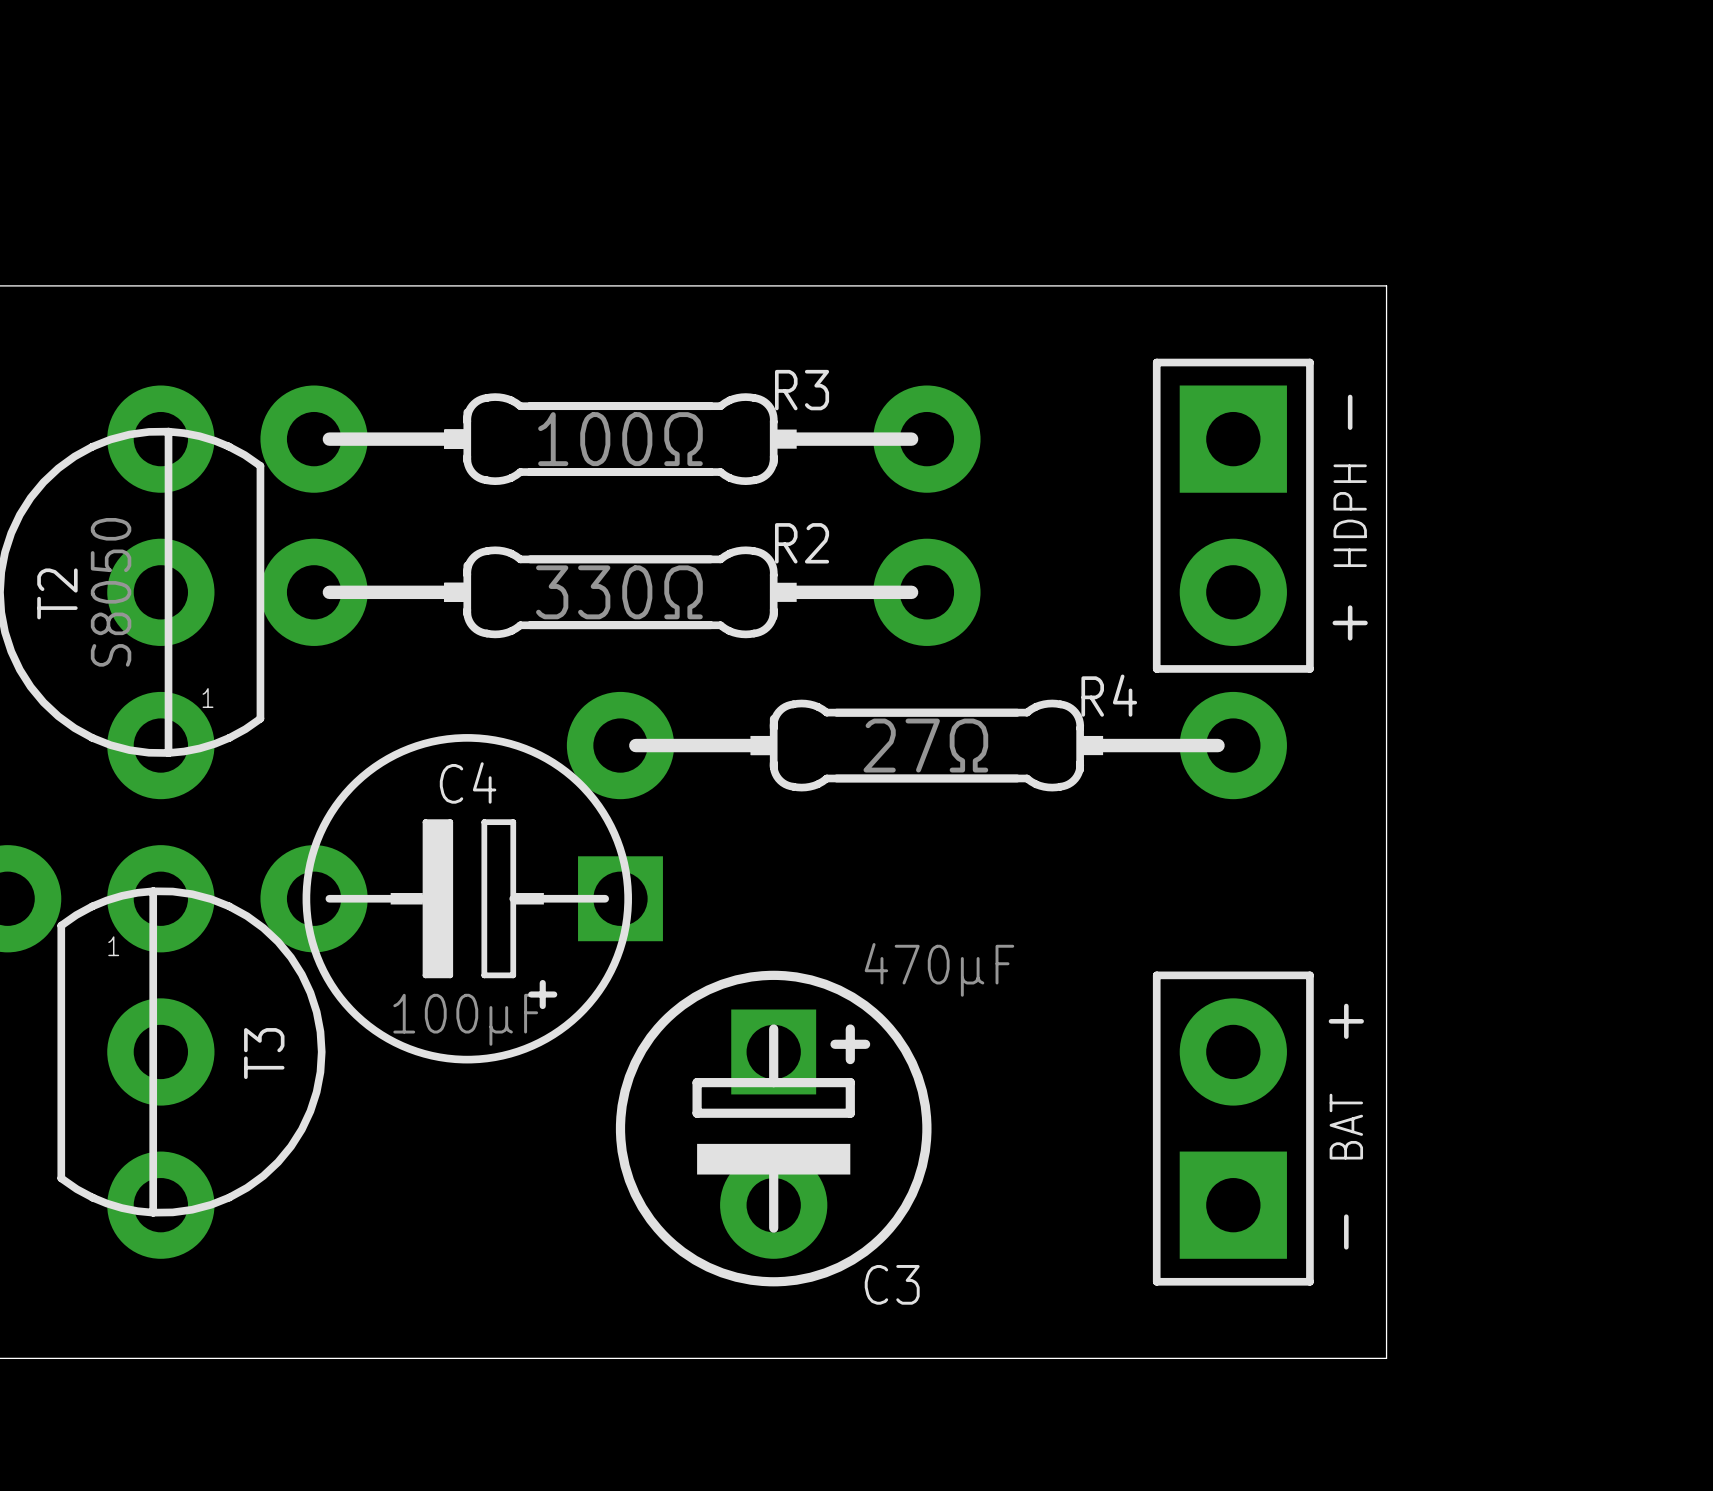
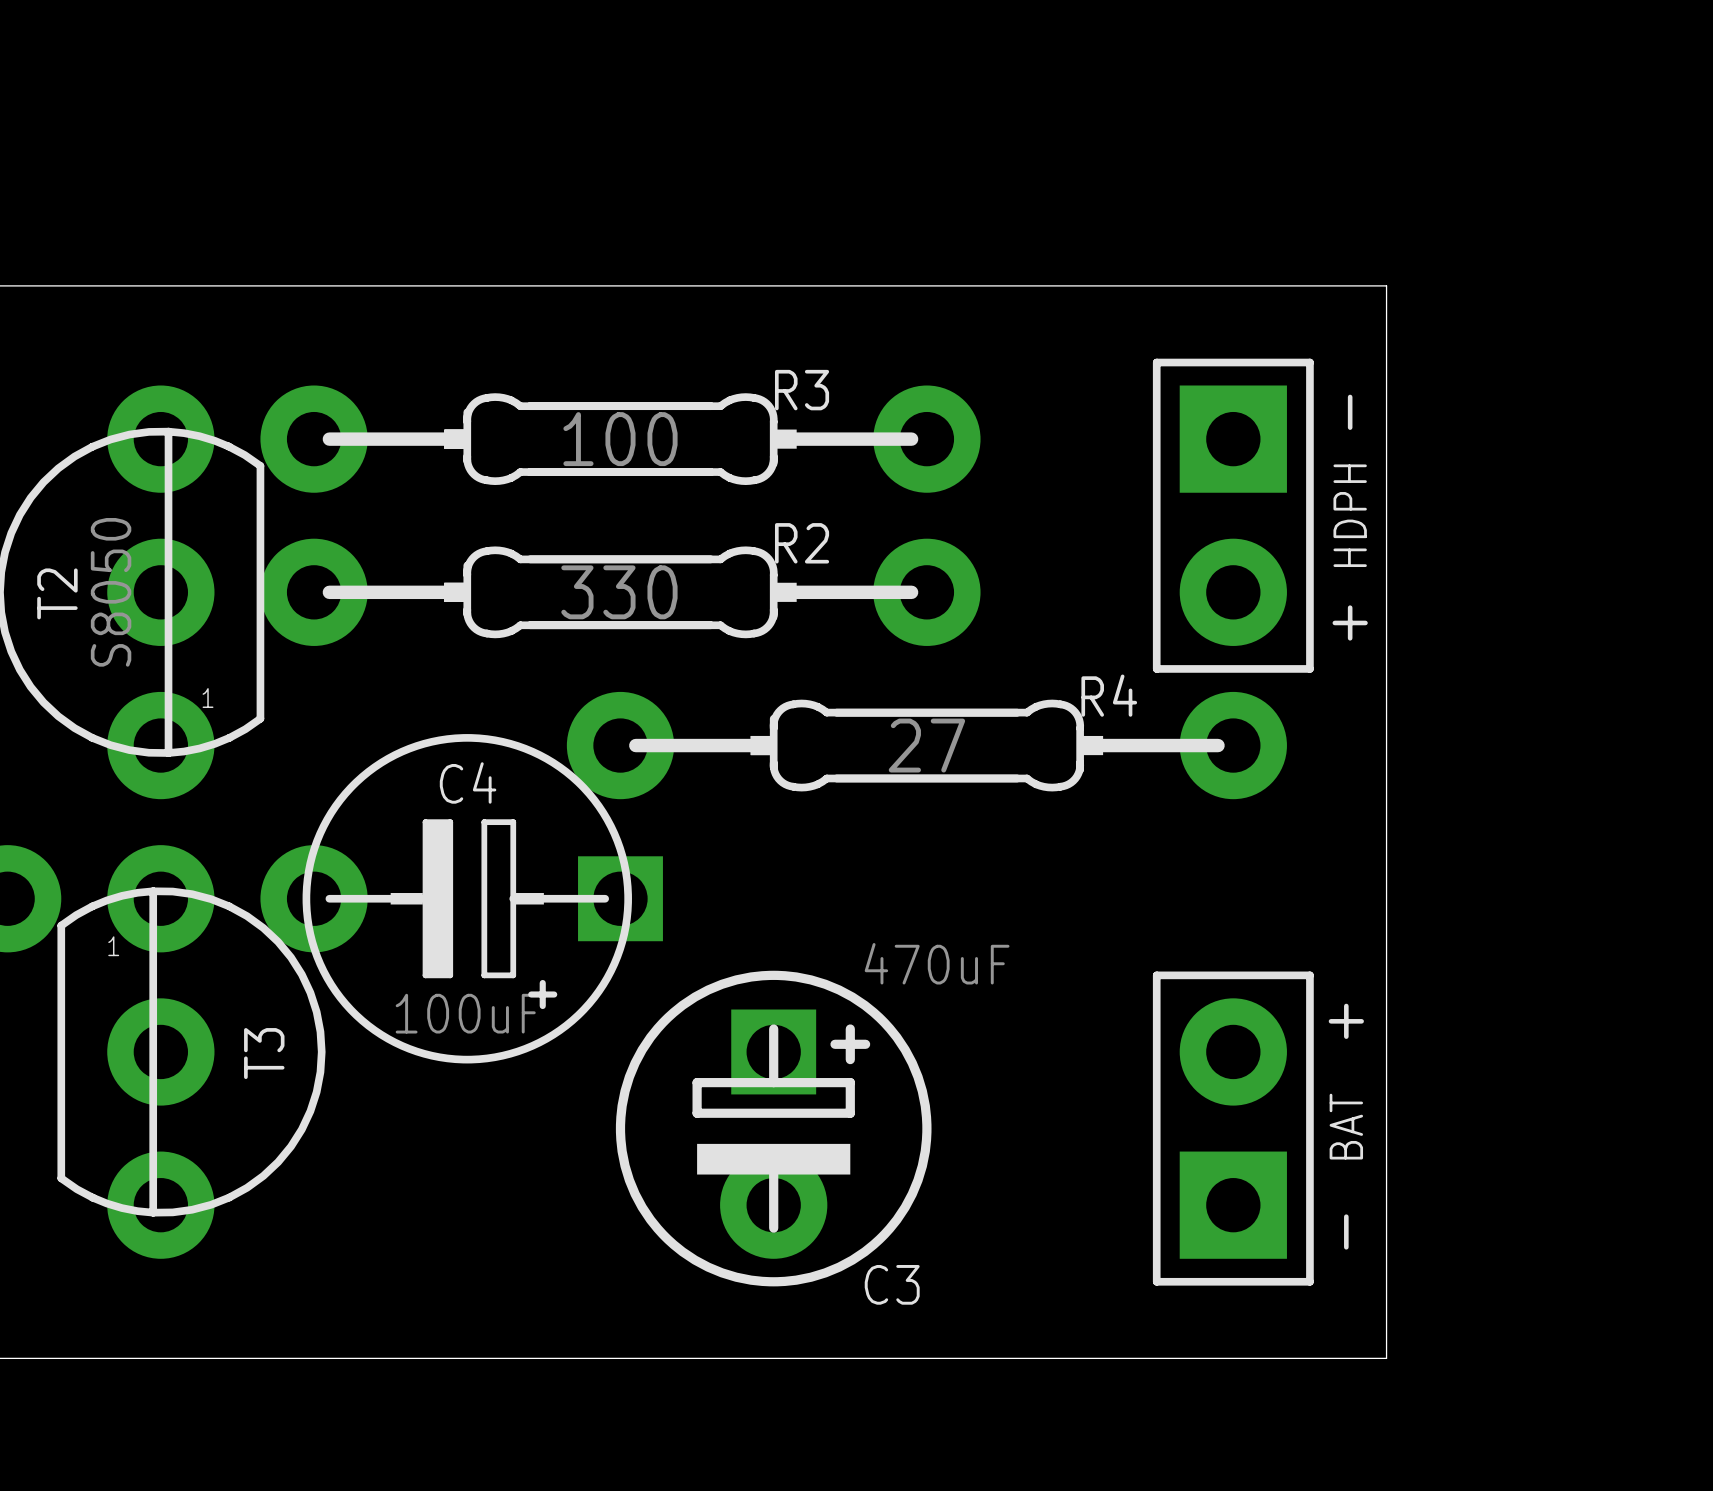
R3 value: 100Ω (620, 439) -> 100 (620, 439)
R2 value: 330Ω (619, 592) -> 330 (619, 592)
R4 value: 27Ω (925, 745) -> 27 (926, 745)
C3 value: 470μF (939, 969) -> 470uF (937, 963)
C4 value: 100μF (468, 1019) -> 100uF (468, 1013)

